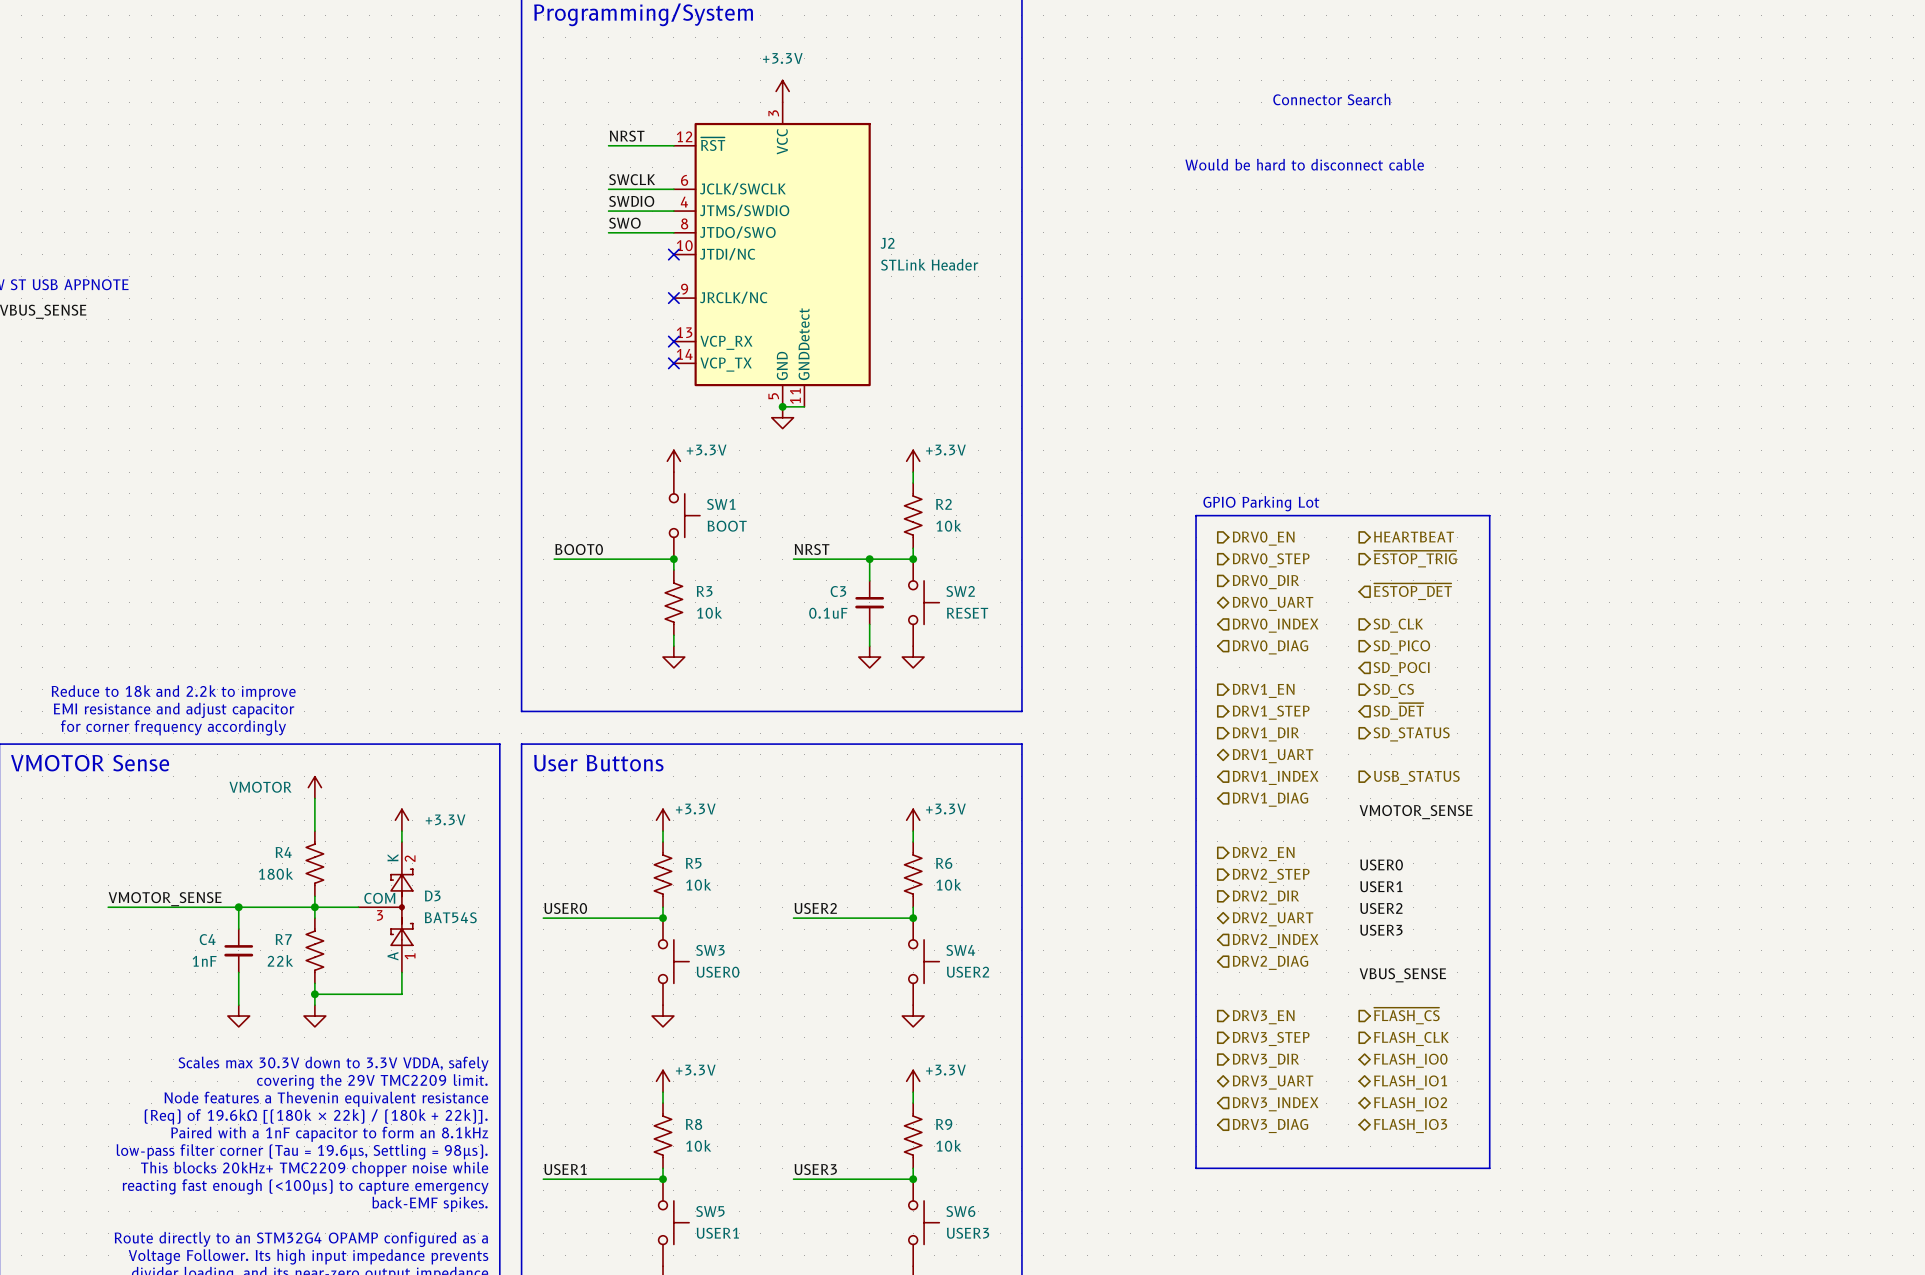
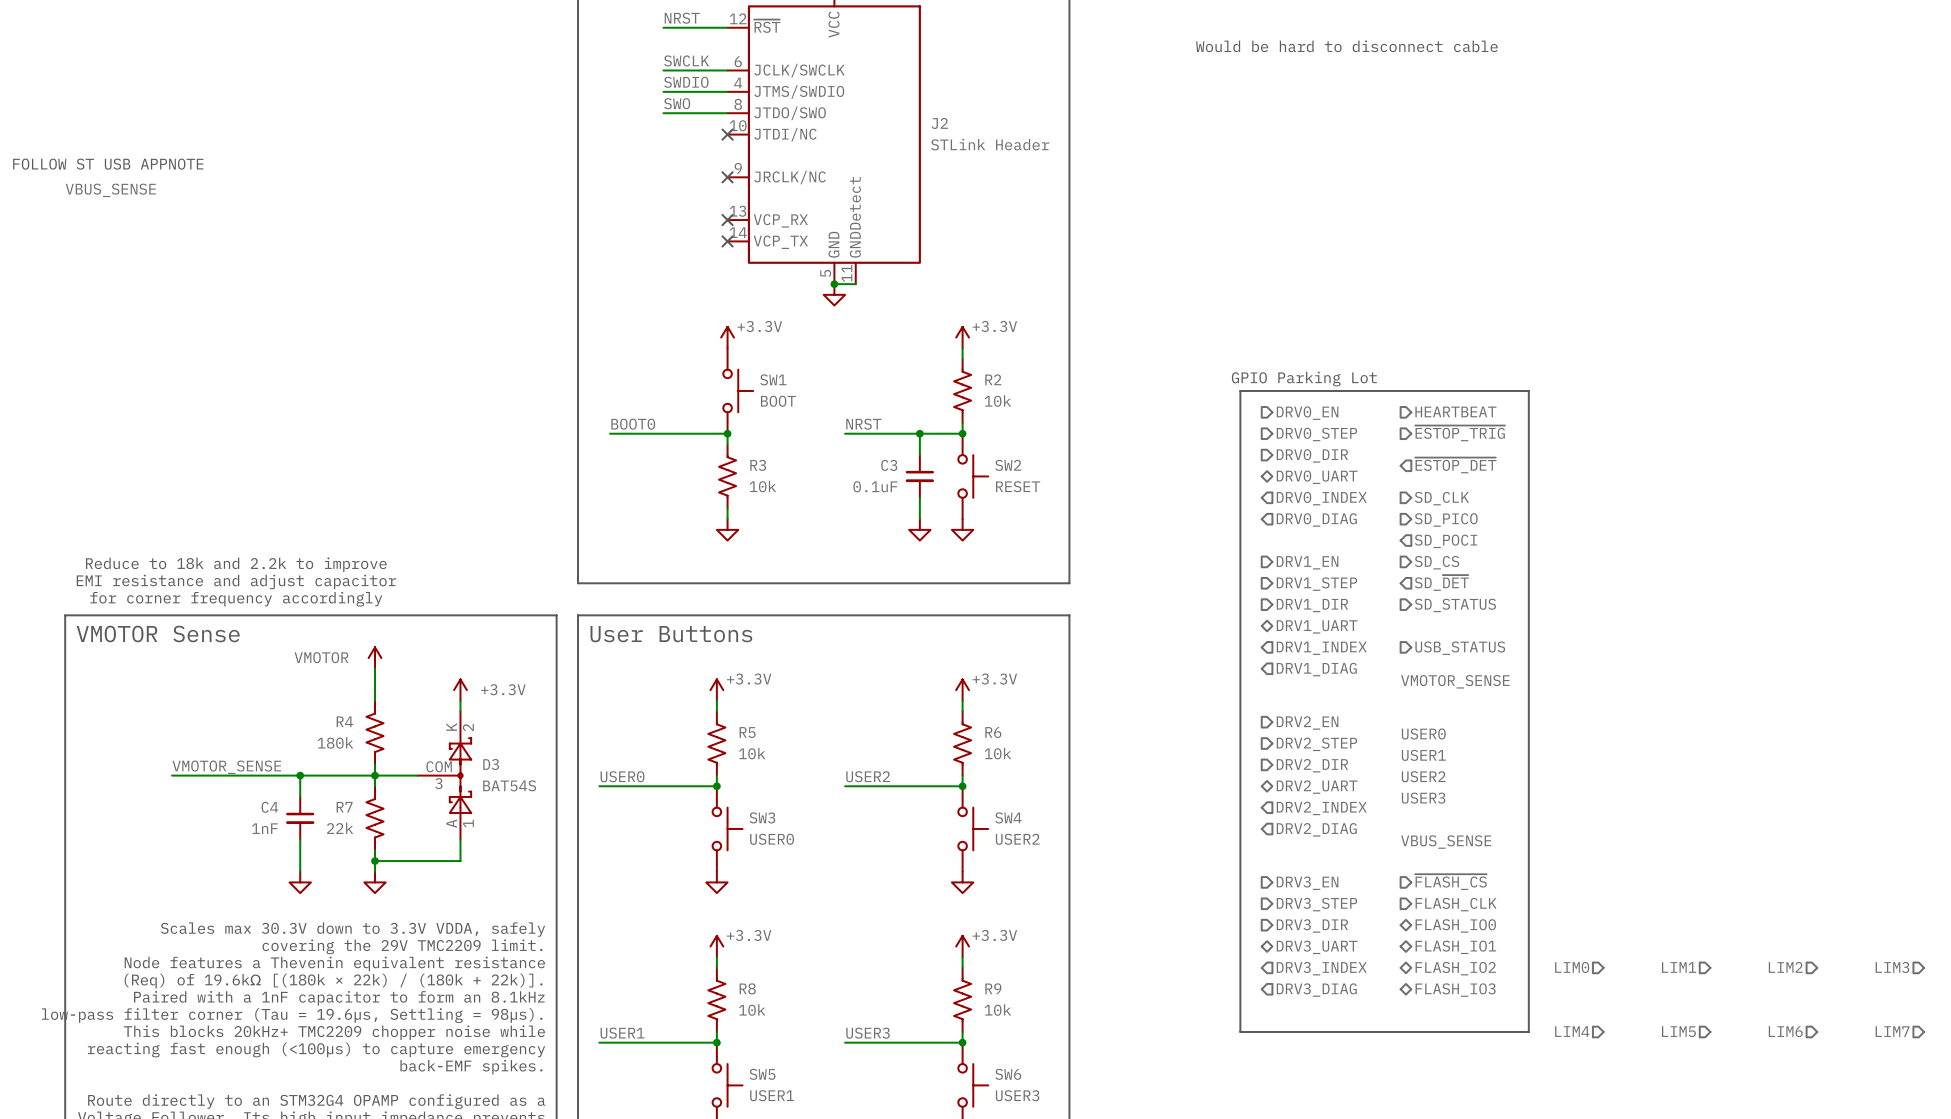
hierarchical label: none -> LIM0 (1572, 967)
hierarchical label: none -> LIM1 (1679, 967)
hierarchical label: none -> LIM2 (1785, 967)
hierarchical label: none -> LIM3 (1892, 967)
hierarchical label: none -> LIM4 (1572, 1031)
hierarchical label: none -> LIM5 (1678, 1031)
hierarchical label: none -> LIM6 (1785, 1031)
hierarchical label: none -> LIM7 (1892, 1031)

